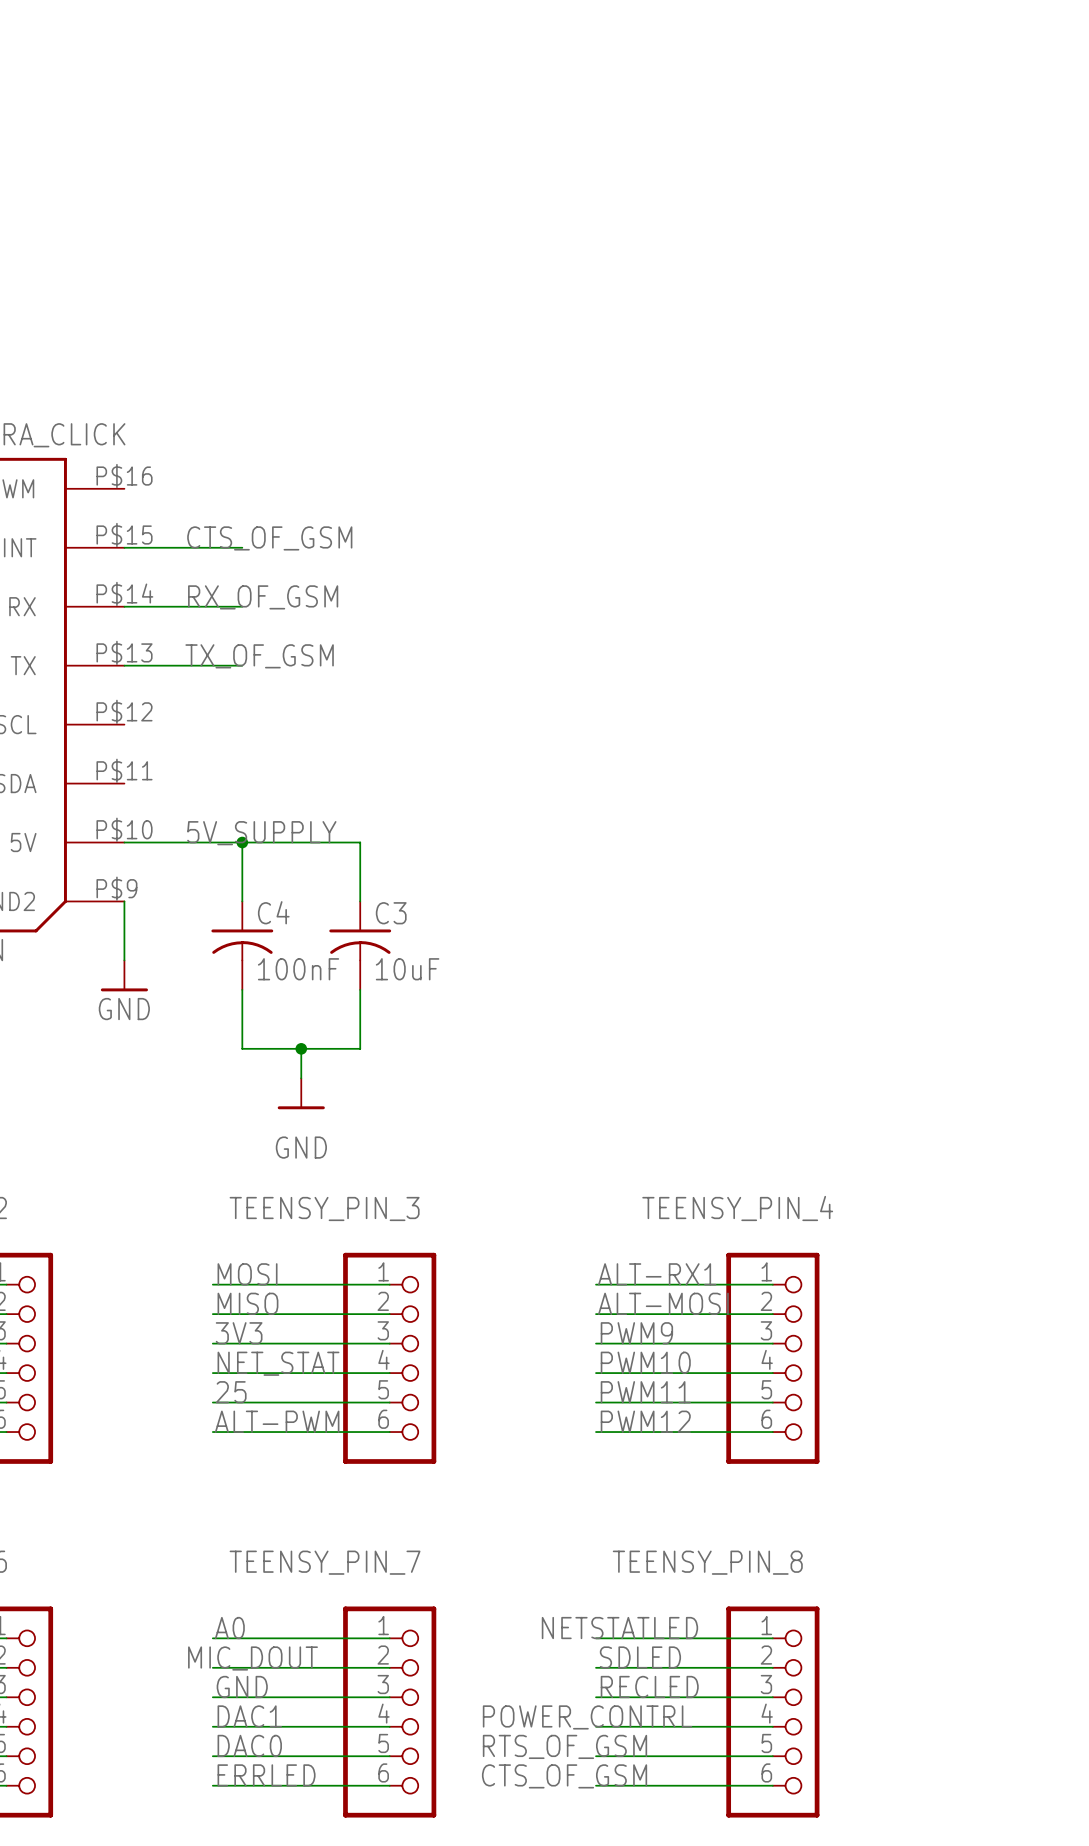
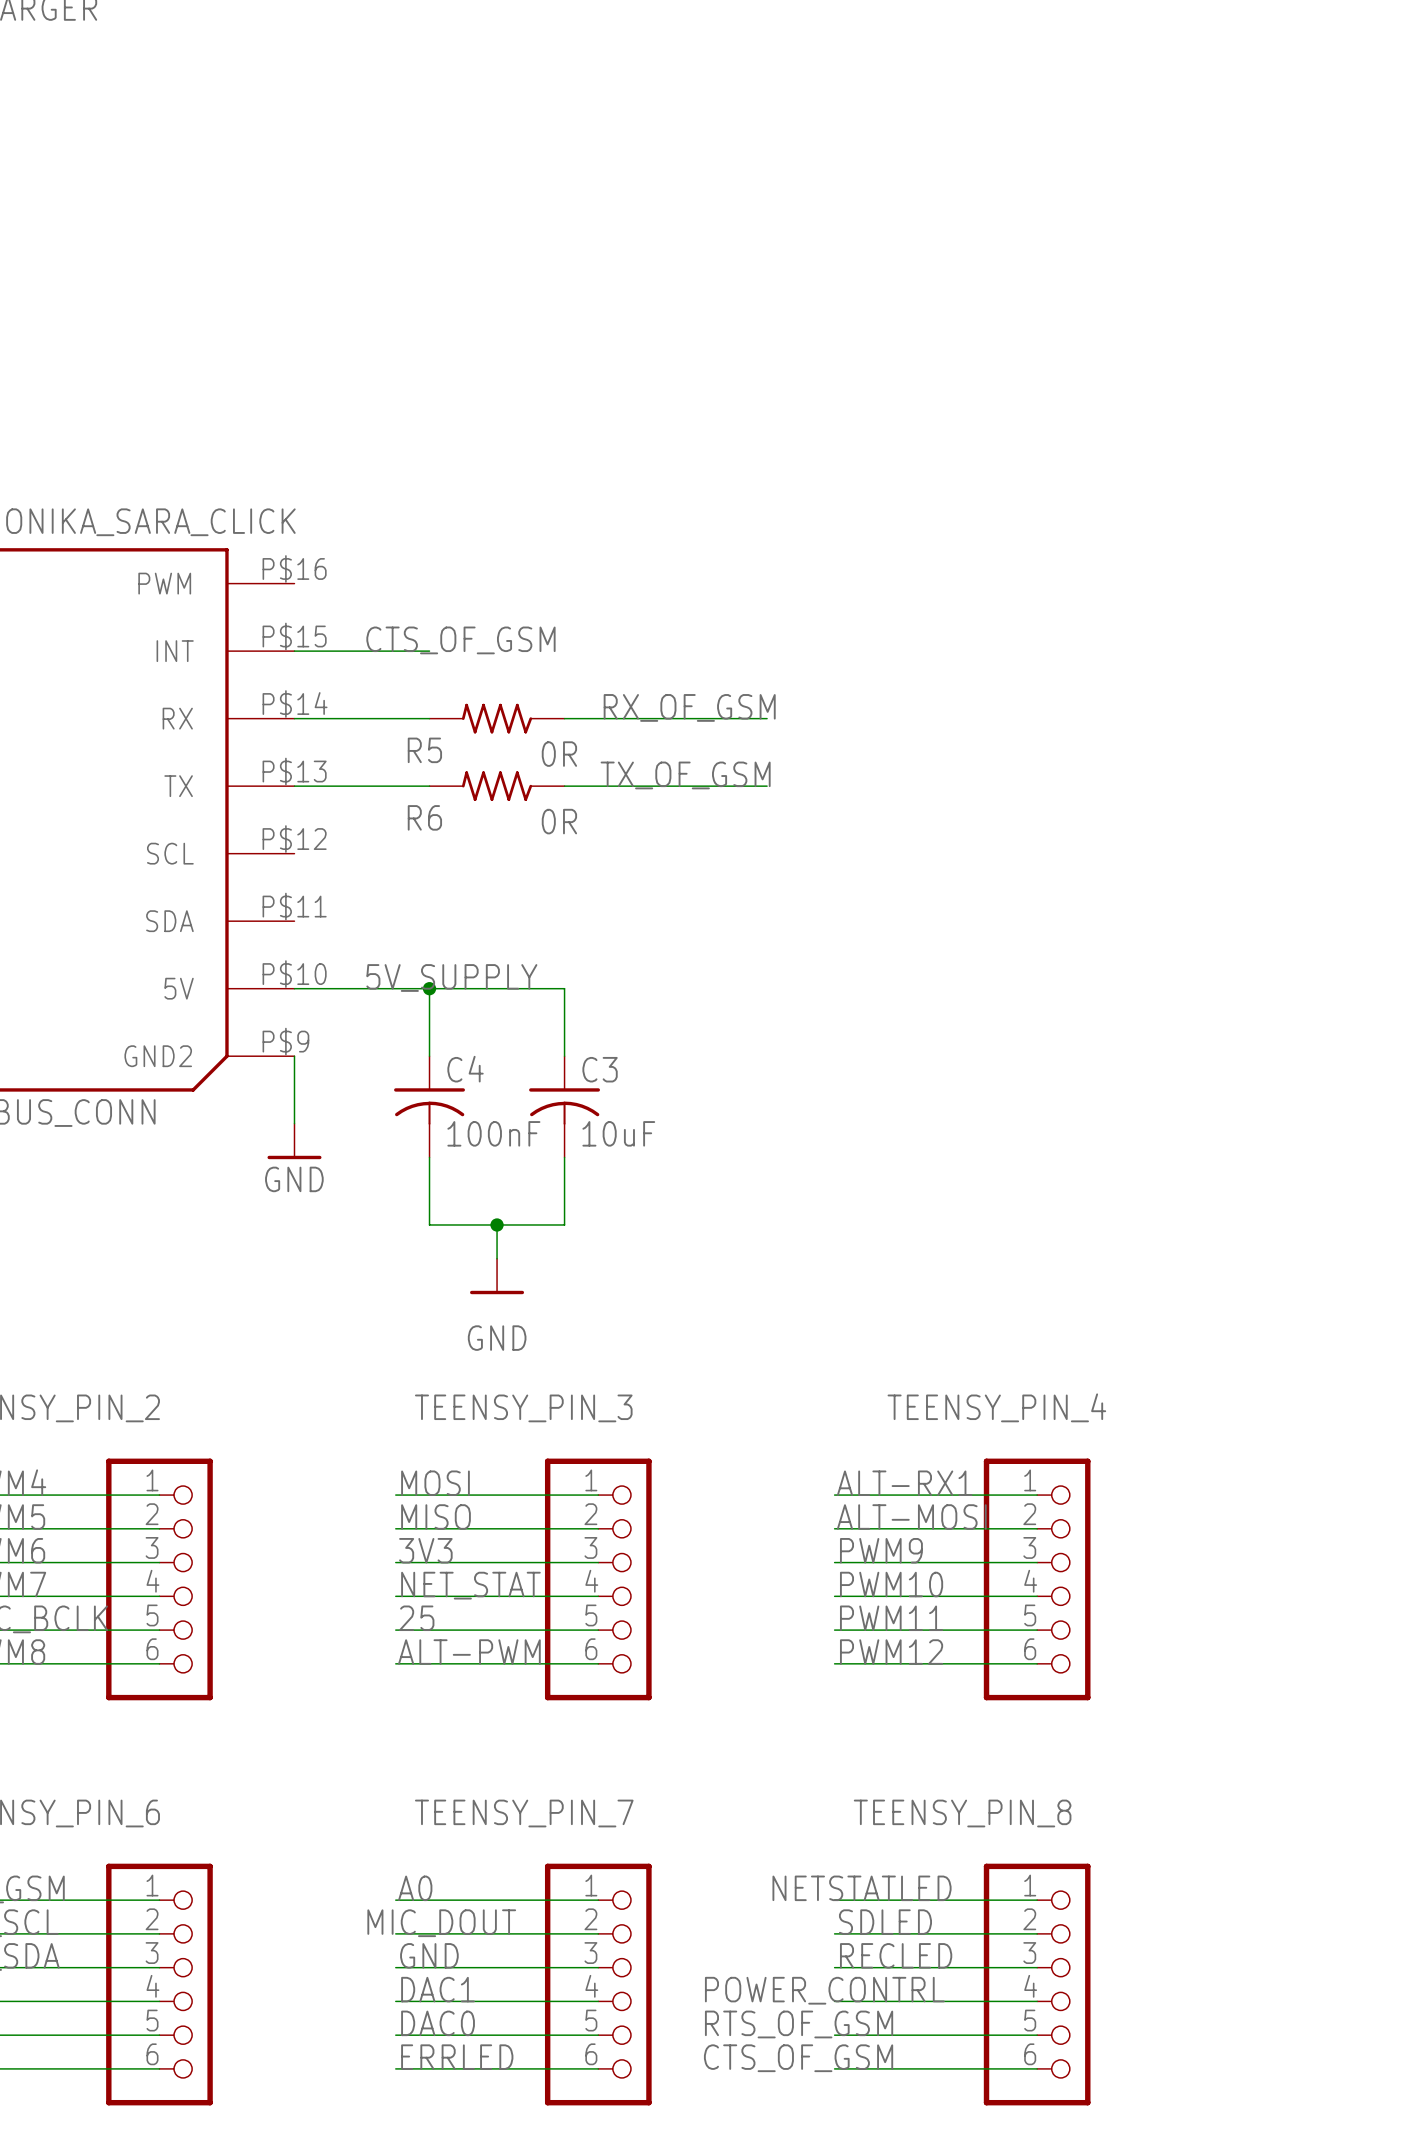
label position: RX_OF_GSM (263, 597) -> RX_OF_GSM (689, 707)
R5: none -> 0R (497, 718)
wire: none -> (564, 718) (767, 718)
label position: TX_OF_GSM (259, 656) -> TX_OF_GSM (685, 775)
R6: none -> 0R (497, 786)
wire: none -> (564, 786) (767, 786)

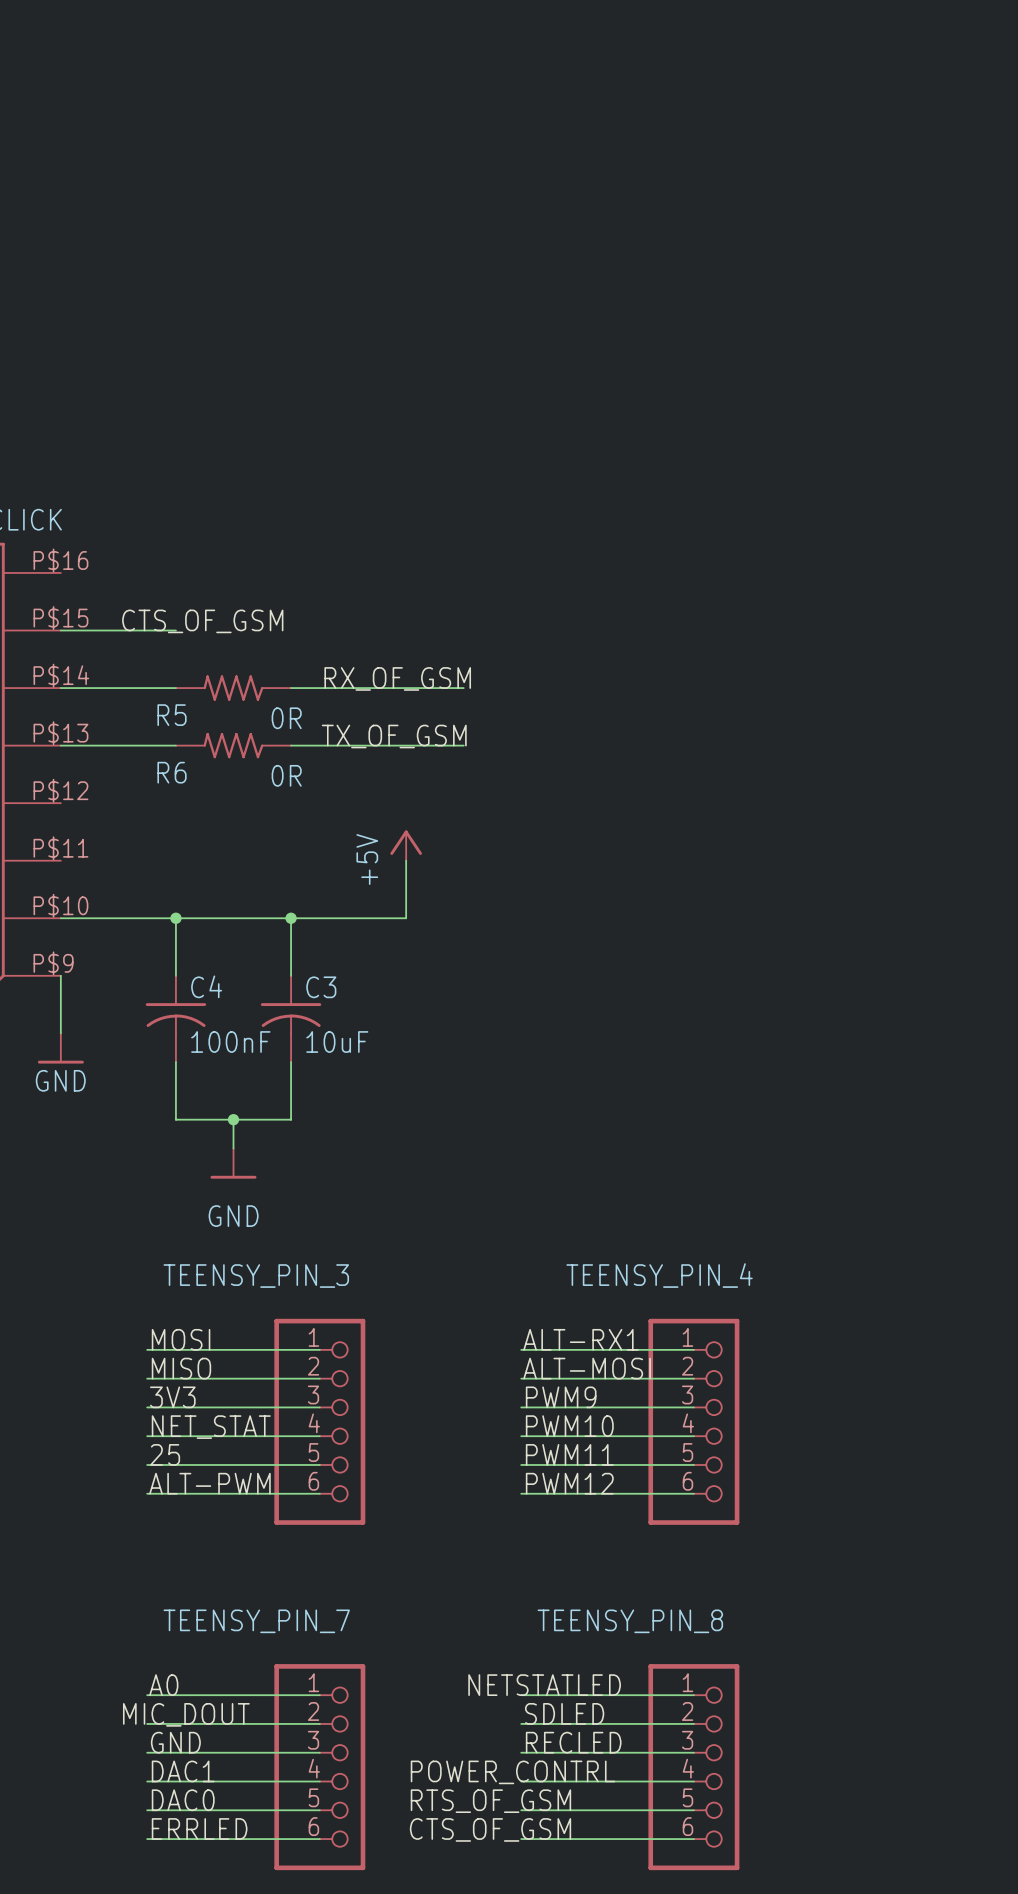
power symbol: none -> +5V (406, 845)
wire: none -> (406, 860) (406, 918) (291, 918)
label: 5V_SUPPLY (451, 978) -> none
junction: none -> (291, 918)

